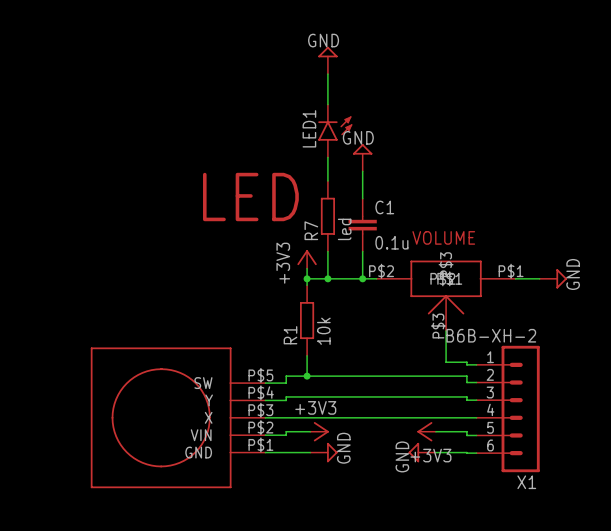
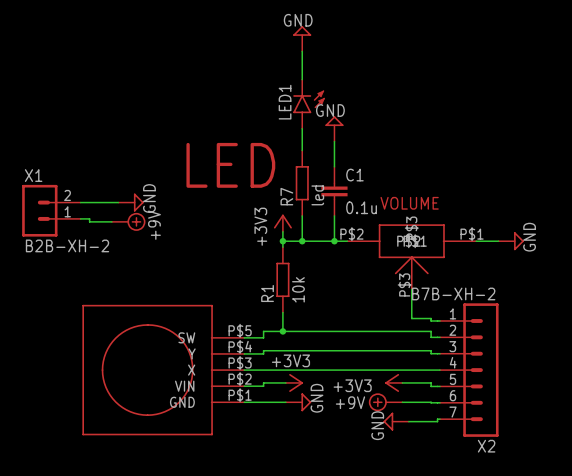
wire: none -> (80, 202) (118, 202)
power symbol: none -> GND (131, 202)
wire: none -> (80, 218) (89, 218) (89, 221) (111, 221)
power symbol: none -> +9V (128, 221)
X1 value: B6B-XH-2 (491, 335) -> B2B-XH-2 (67, 245)
X1 symbol: [476, 345, 540, 473] -> [22, 184, 81, 237]
X2: none -> B7B-XH-2 (469, 370)
power symbol: GND (422, 452) -> +9V (385, 402)
power symbol text position: +3V3 (430, 455) -> +3V3 (352, 385)
wire: none -> (439, 419) (437, 419) (437, 421) (408, 421)
power symbol: none -> GND (396, 421)
X1 name position: X1 (526, 482) -> X1 (33, 175)

